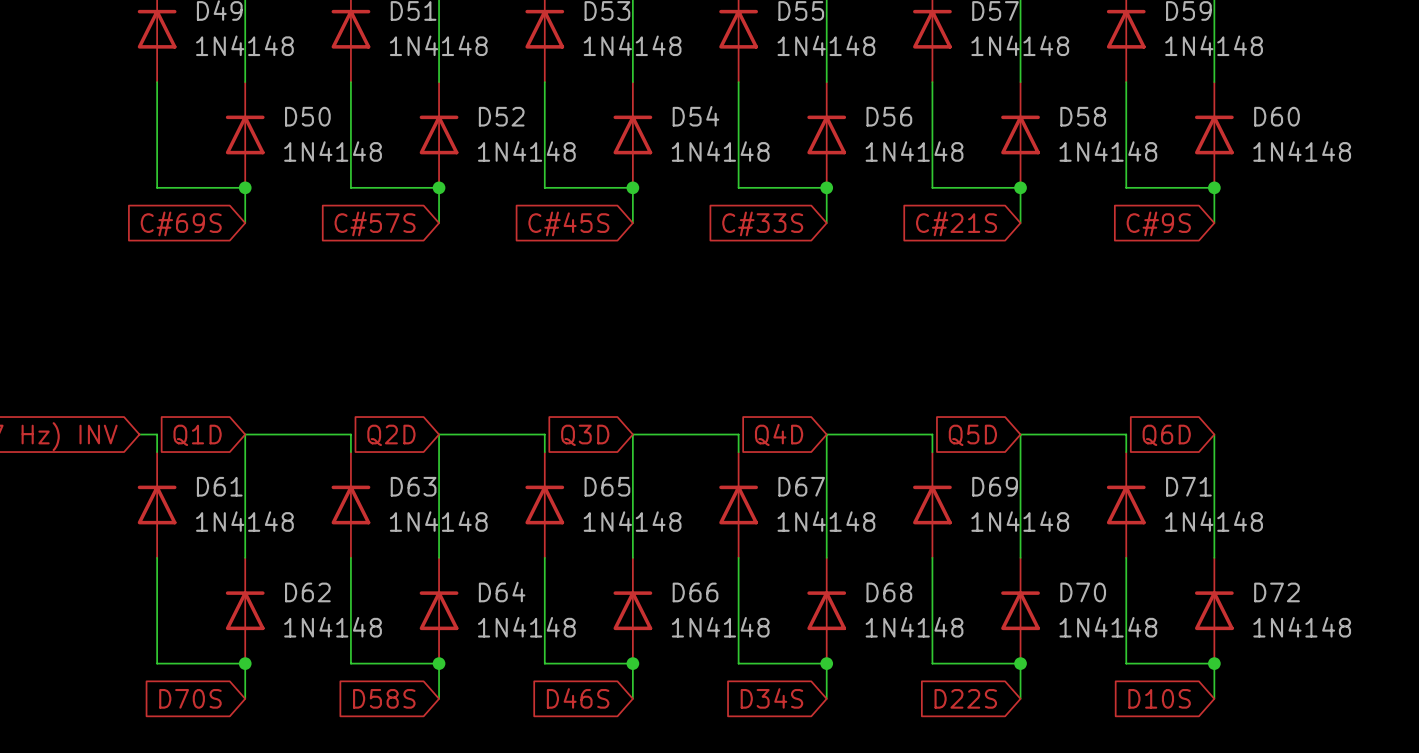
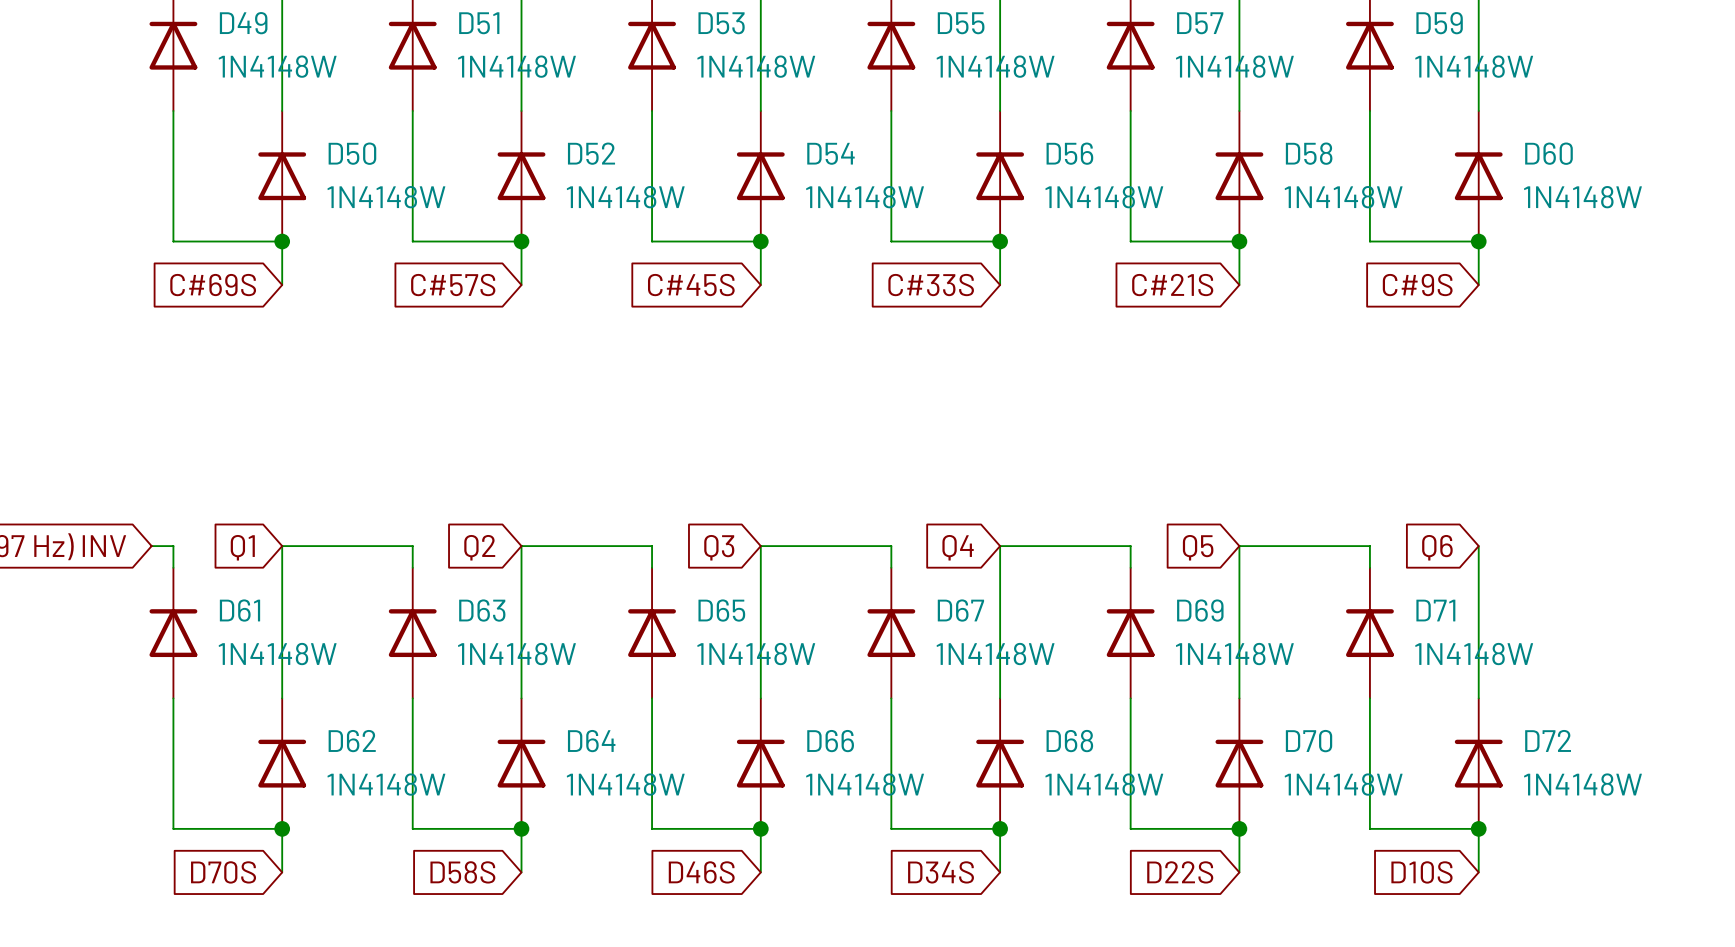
D49 value: 1N4148 (244, 45) -> 1N4148W (277, 66)
D51 value: 1N4148 (438, 45) -> 1N4148W (516, 66)
D53 value: 1N4148 (632, 45) -> 1N4148W (756, 66)
D55 value: 1N4148 (826, 45) -> 1N4148W (995, 66)
D57 value: 1N4148 (1020, 45) -> 1N4148W (1234, 66)
D59 value: 1N4148 (1214, 45) -> 1N4148W (1474, 66)
D50 value: 1N4148 (333, 151) -> 1N4148W (386, 197)
D52 value: 1N4148 (526, 151) -> 1N4148W (625, 197)
D54 value: 1N4148 (720, 151) -> 1N4148W (865, 197)
D56 value: 1N4148 (914, 151) -> 1N4148W (1104, 197)
D58 value: 1N4148 (1108, 151) -> 1N4148W (1343, 197)
D60 value: 1N4148 (1302, 151) -> 1N4148W (1582, 197)
global label: Q4D (779, 434) -> Q4 (958, 547)
global label: Q1D (197, 435) -> Q1 (242, 547)
global label: Q2D (391, 435) -> Q2 (479, 547)
global label: Q3D (585, 435) -> Q3 (719, 547)
global label: Q5D (972, 435) -> Q5 (1198, 547)
global label: Q6D (1166, 435) -> Q6 (1437, 547)
D61 value: 1N4148 (244, 521) -> 1N4148W (277, 654)
D63 value: 1N4148 (438, 521) -> 1N4148W (516, 654)
D65 value: 1N4148 (632, 521) -> 1N4148W (756, 654)
D67 value: 1N4148 (826, 521) -> 1N4148W (995, 654)
D69 value: 1N4148 (1020, 521) -> 1N4148W (1234, 654)
D71 value: 1N4148 (1214, 521) -> 1N4148W (1474, 654)
D62 value: 1N4148 (333, 627) -> 1N4148W (386, 784)
D64 value: 1N4148 (526, 627) -> 1N4148W (625, 784)
D66 value: 1N4148 (720, 627) -> 1N4148W (865, 784)
D68 value: 1N4148 (914, 627) -> 1N4148W (1104, 784)
D70 value: 1N4148 (1108, 627) -> 1N4148W (1343, 784)
D72 value: 1N4148 (1302, 627) -> 1N4148W (1582, 784)

